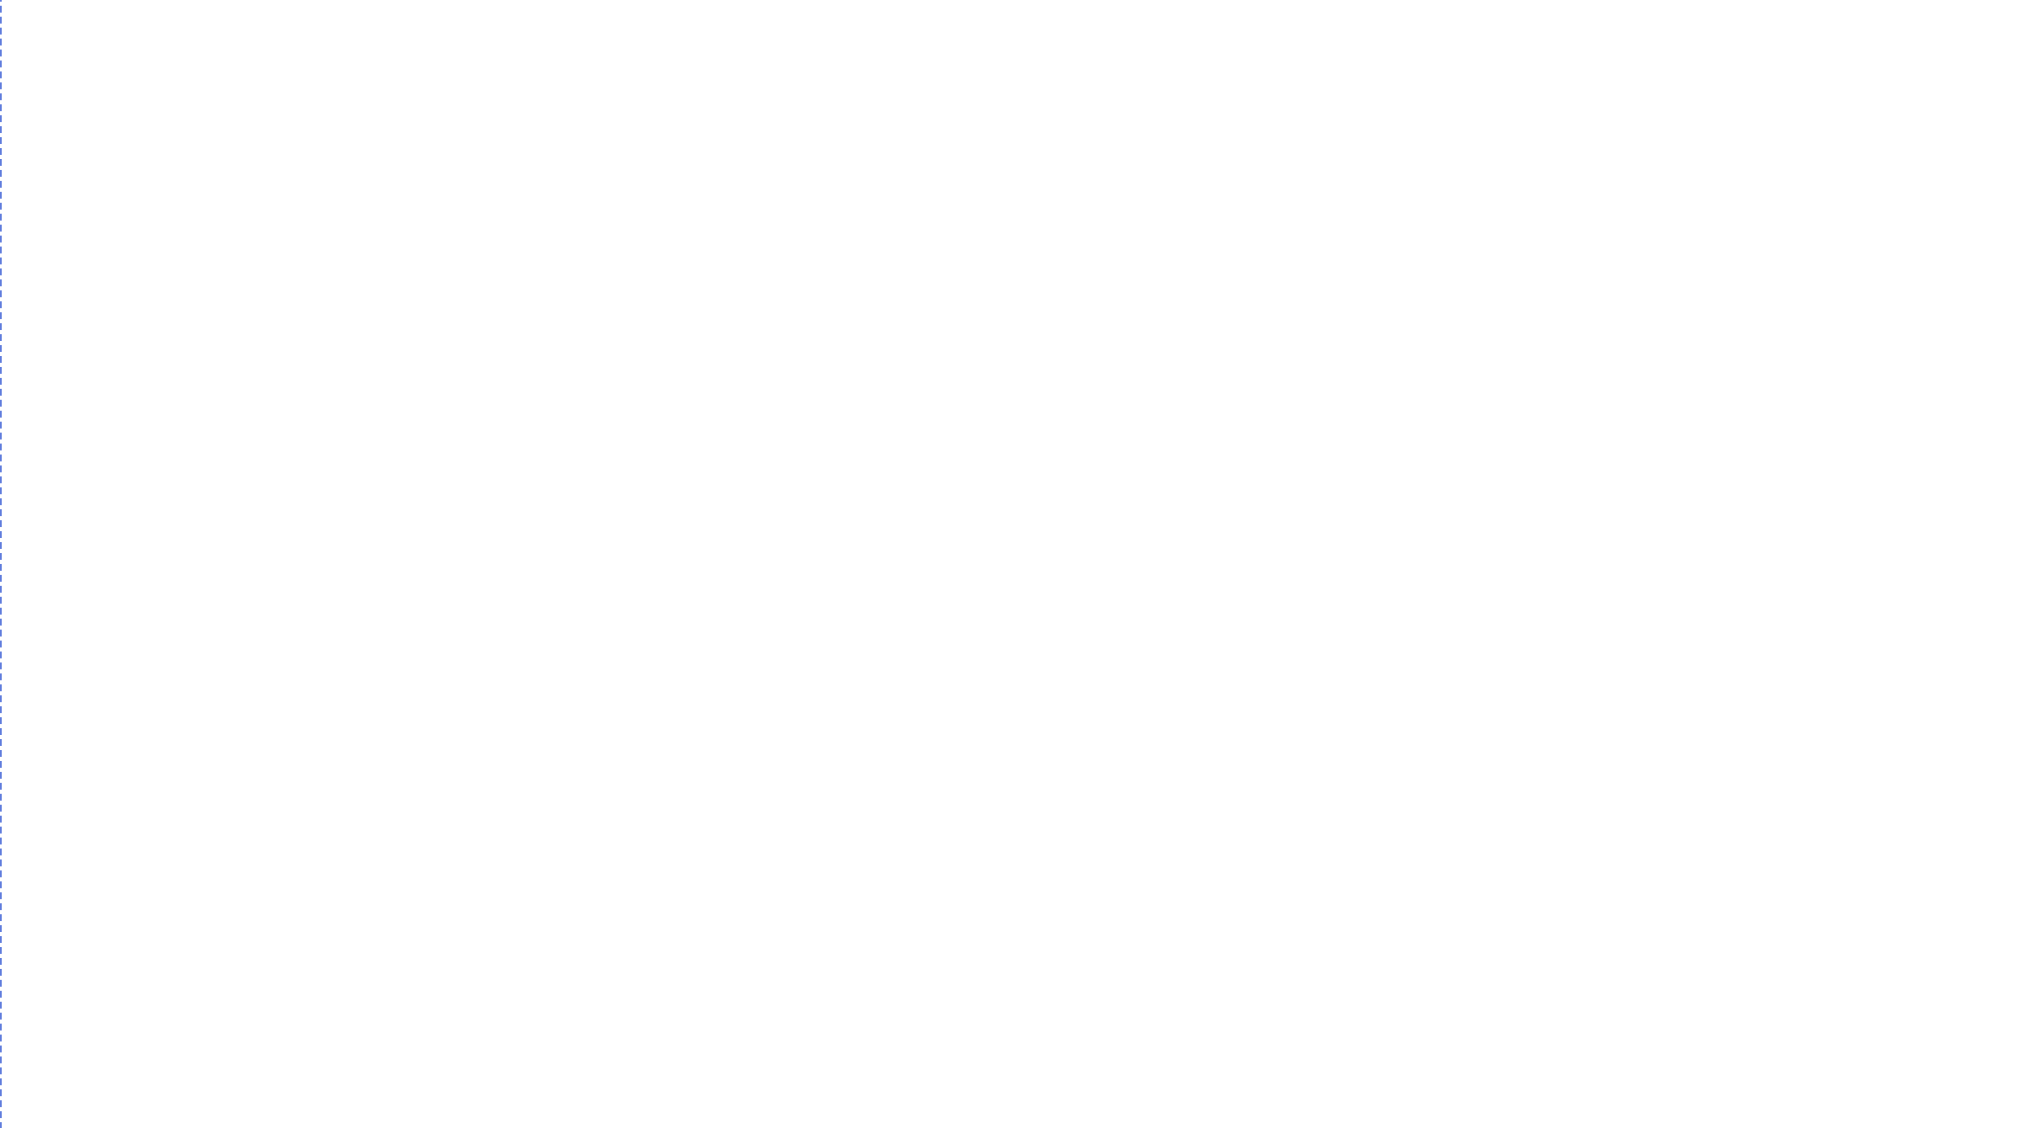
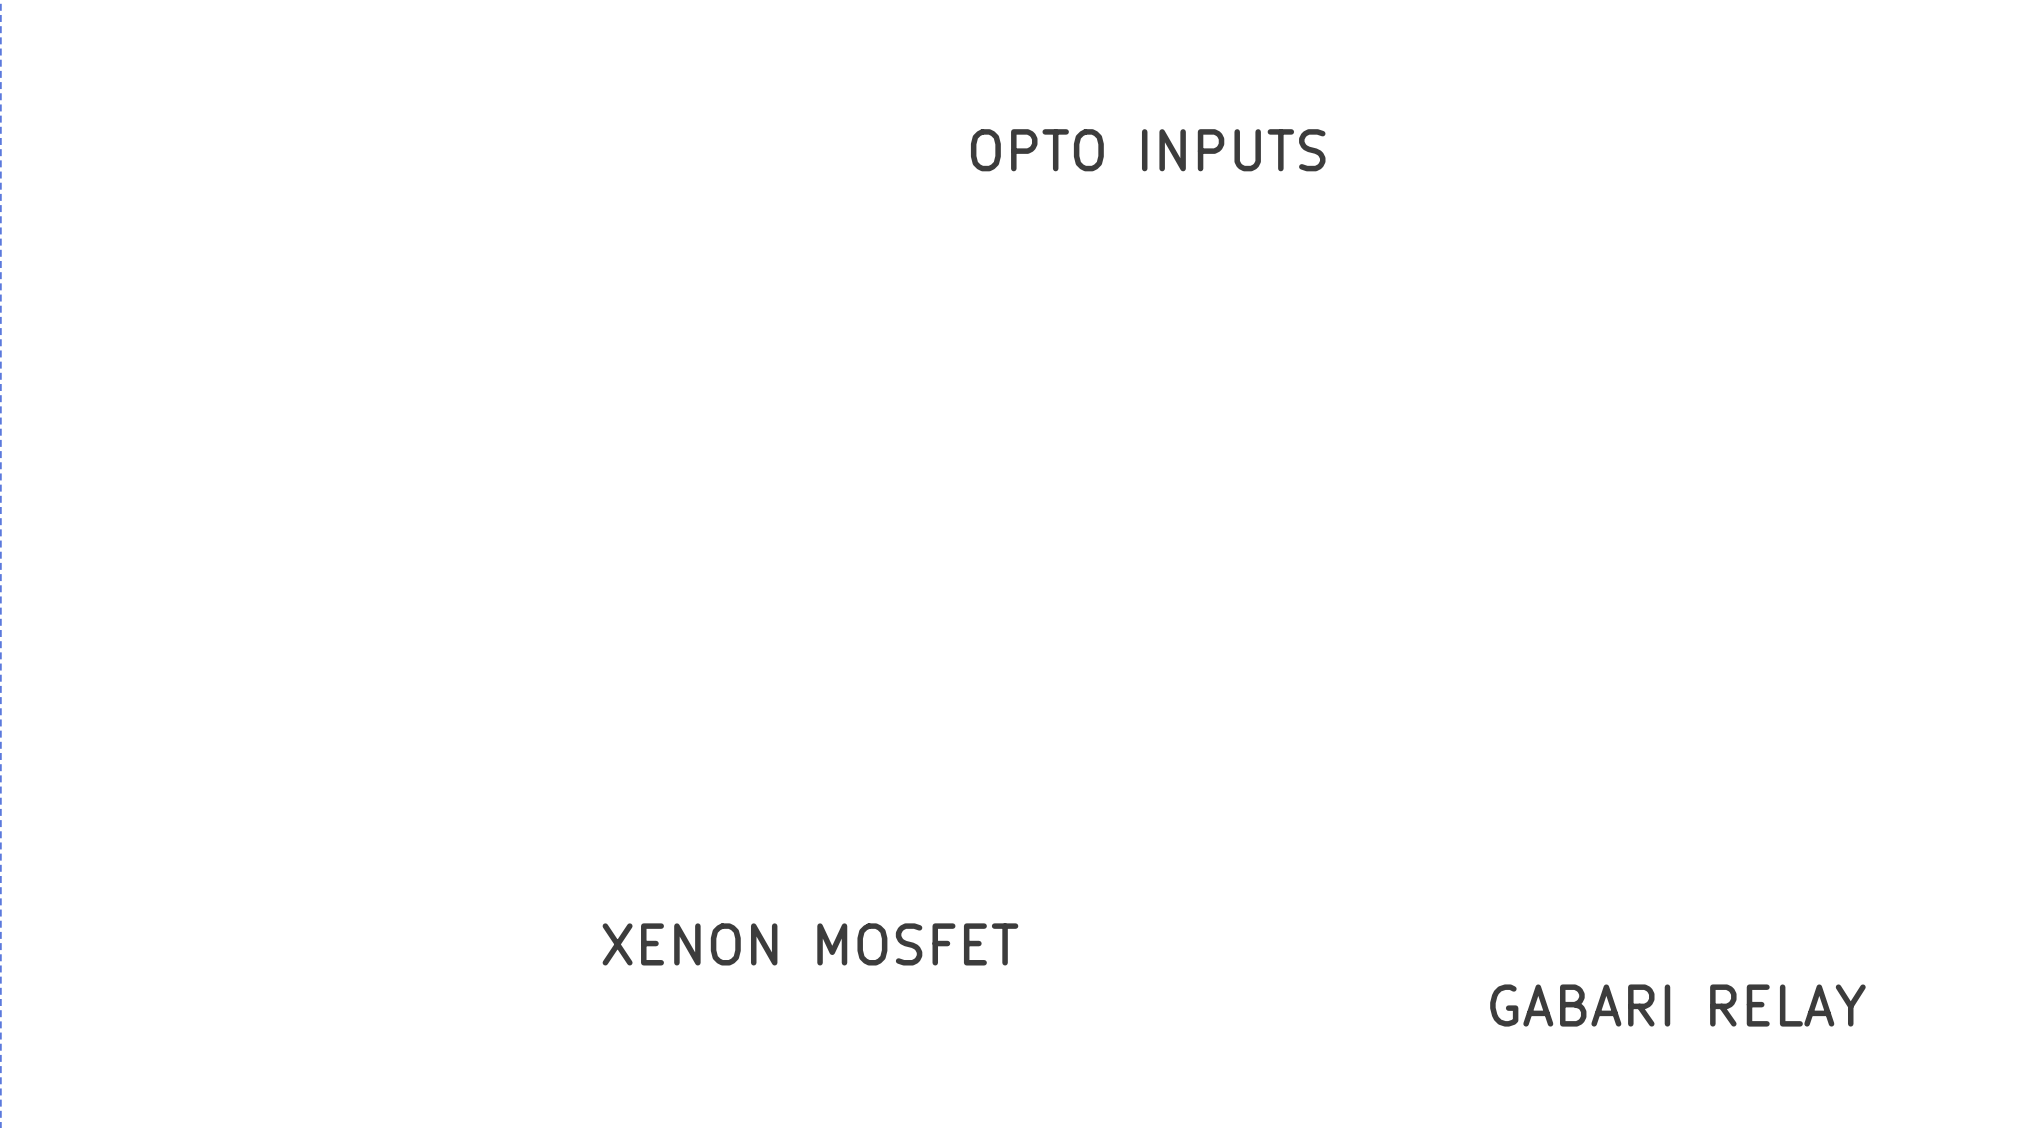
text: none -> OPTO INPUTS (1148, 150)
text: none -> XENON MOSFET (810, 944)
text: none -> GABARI RELAY (1677, 1005)

